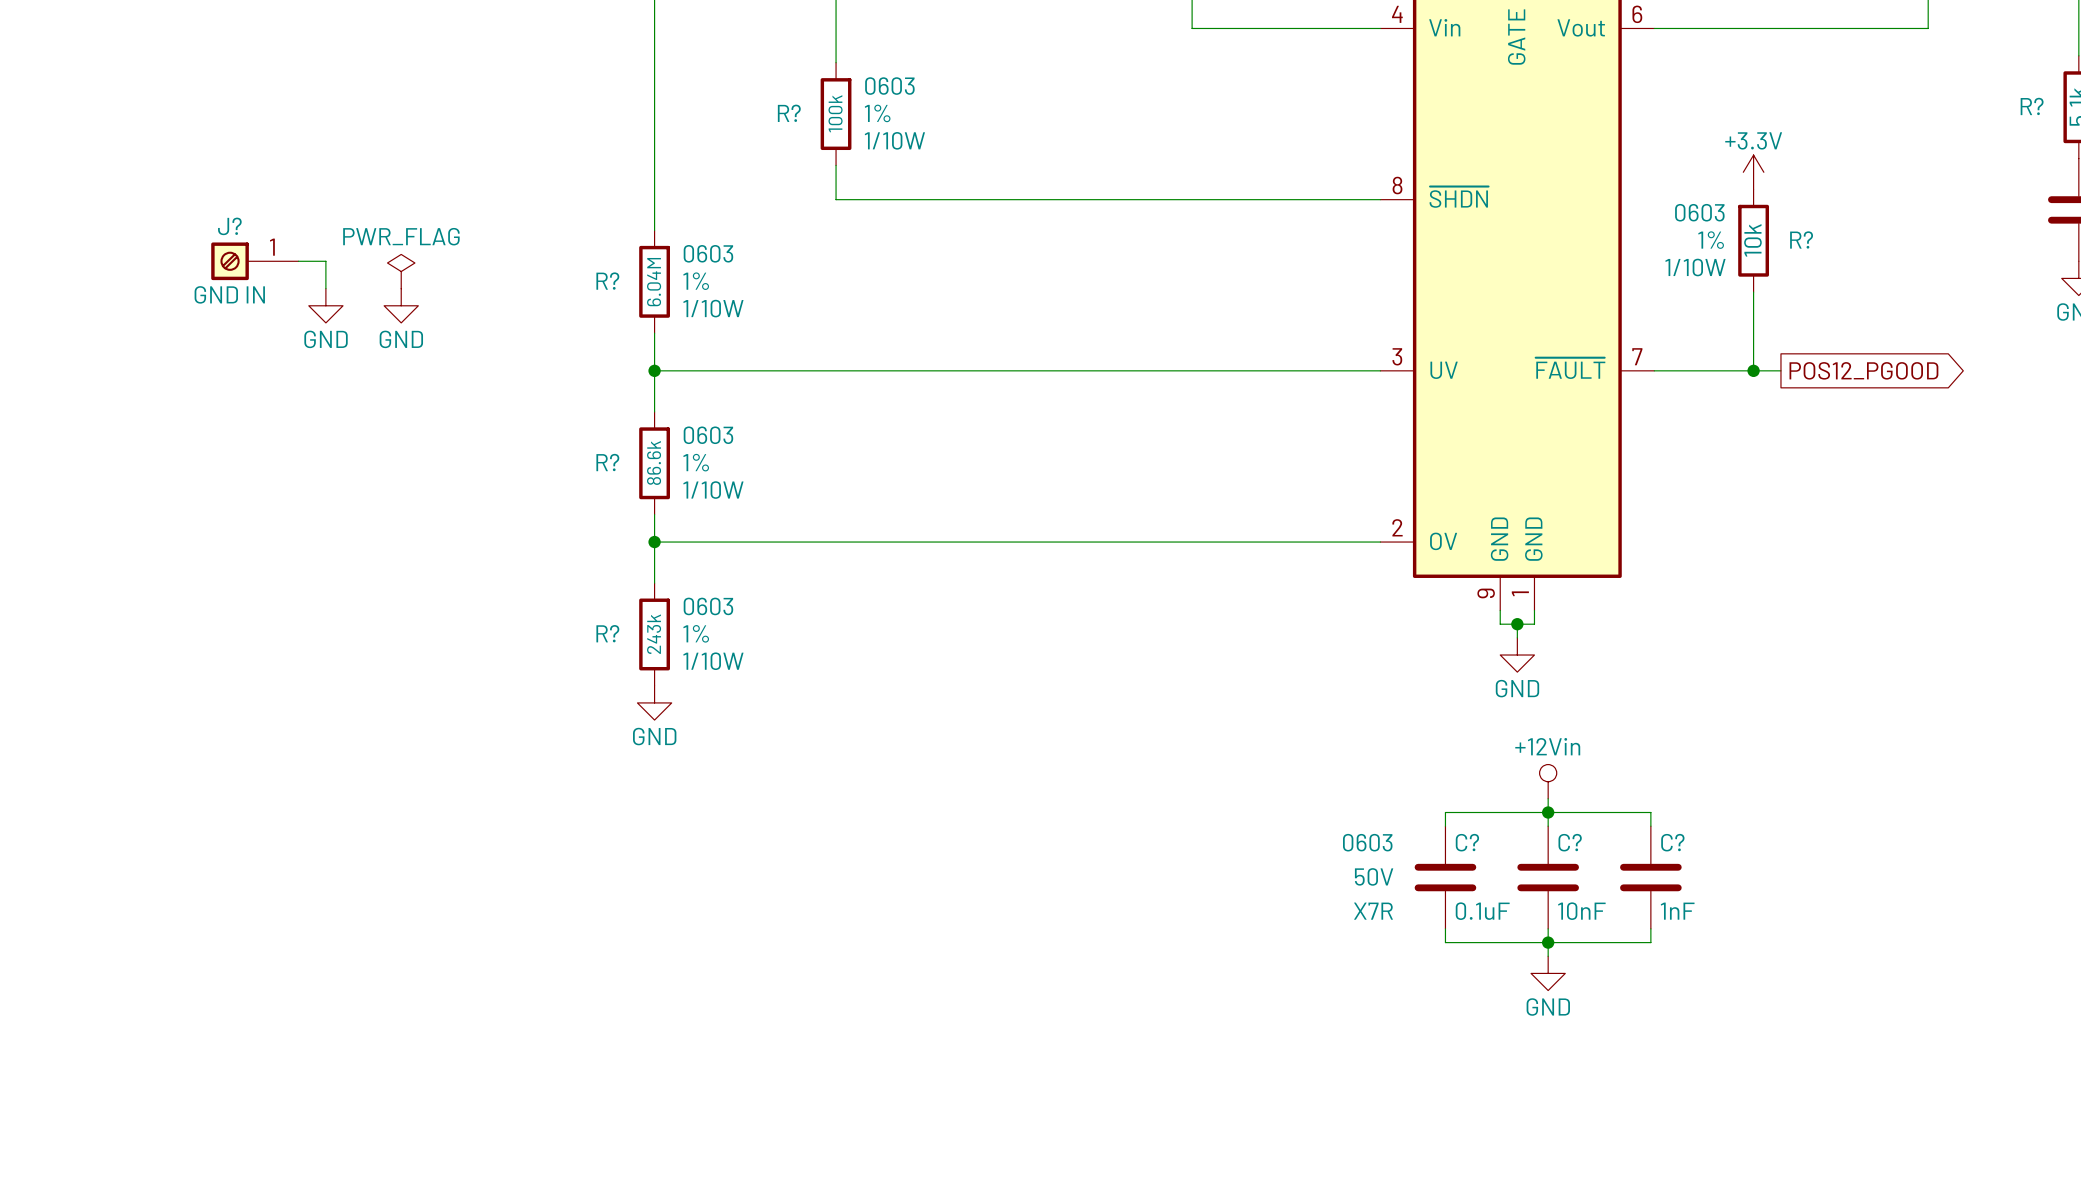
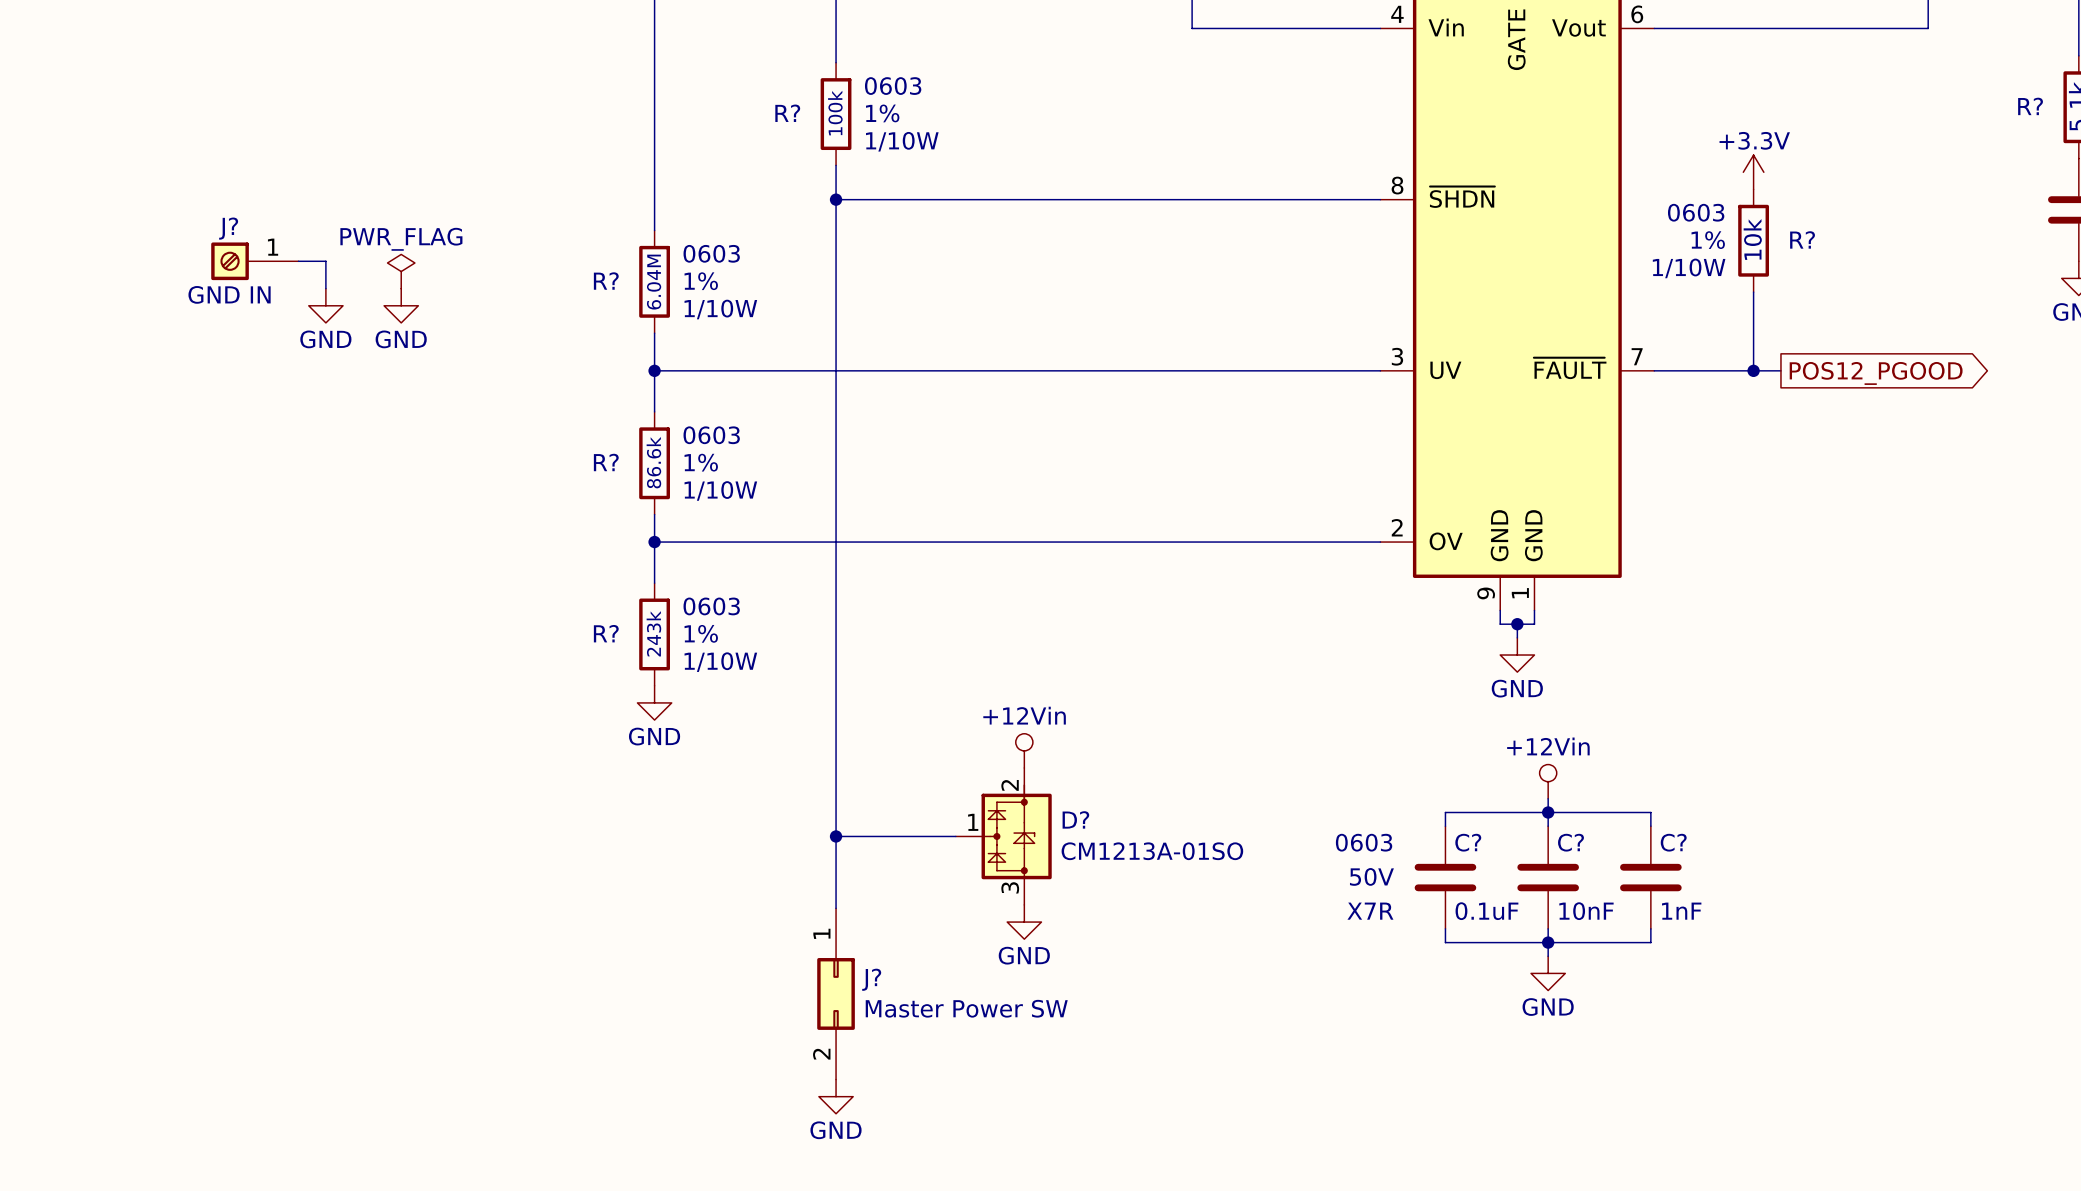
wire: none -> (836, 199) (836, 908)
junction: none -> (836, 199)
power symbol: none -> +12Vin (1024, 750)
wire: none -> (836, 836) (955, 836)
junction: none -> (836, 836)
D?: none -> CM1213A-01SO (1003, 836)
power symbol: none -> GND (1024, 922)
J?: none -> Master Power SW (836, 993)
power symbol: none -> GND (836, 1096)

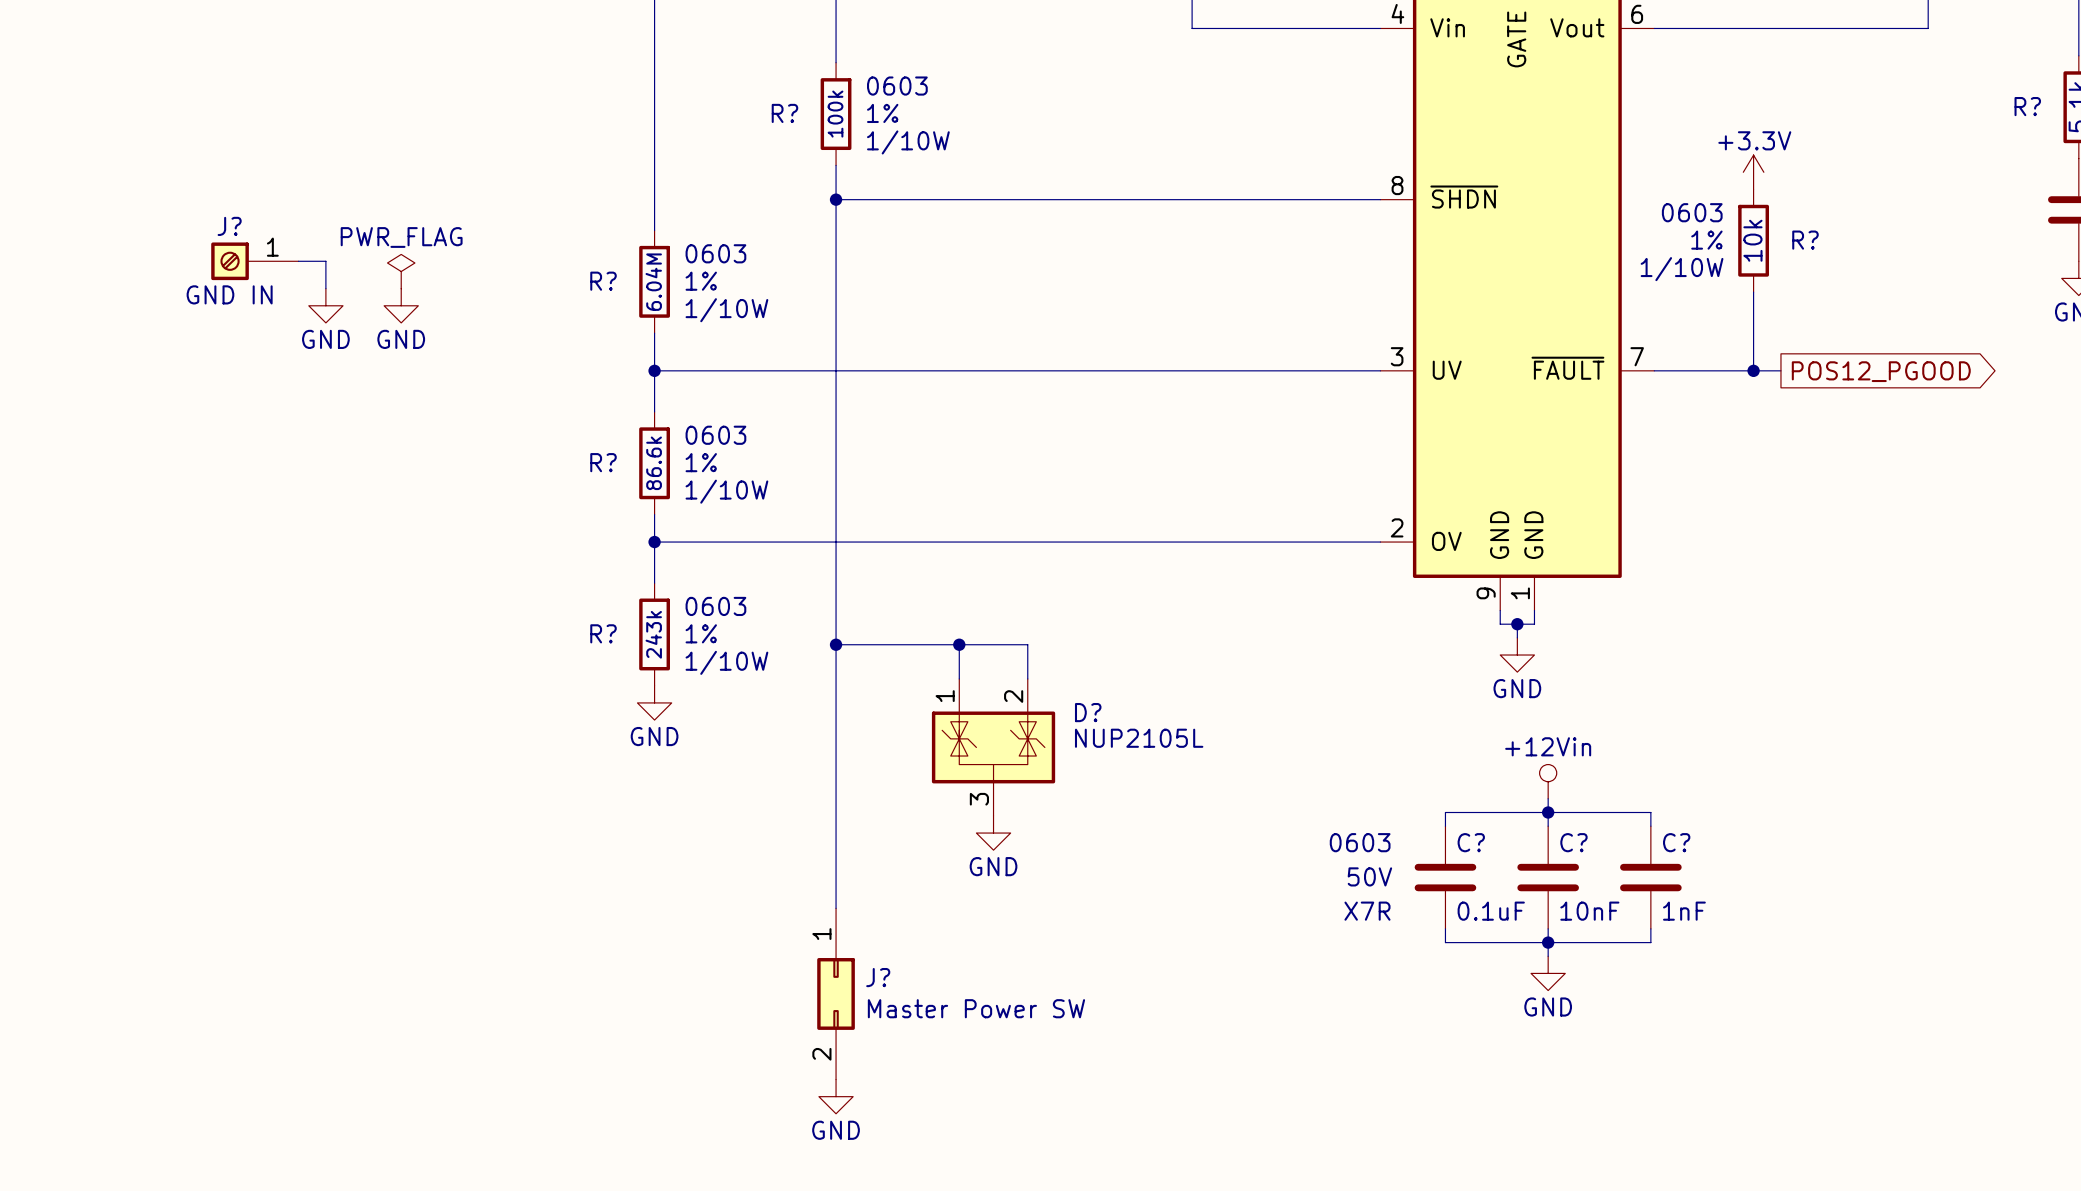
wire: none -> (836, 644) (1027, 644) (1027, 678)
junction: none -> (836, 644)
wire: none -> (959, 644) (959, 678)
junction: none -> (959, 644)
D?: none -> NUP2105L (993, 747)
power symbol: +12Vin (1024, 750) -> none
wire: (836, 836) (955, 836) -> none
junction: (836, 836) -> none
D?: CM1213A-01SO (1003, 836) -> none
power symbol position: GND (1024, 922) -> GND (993, 833)

